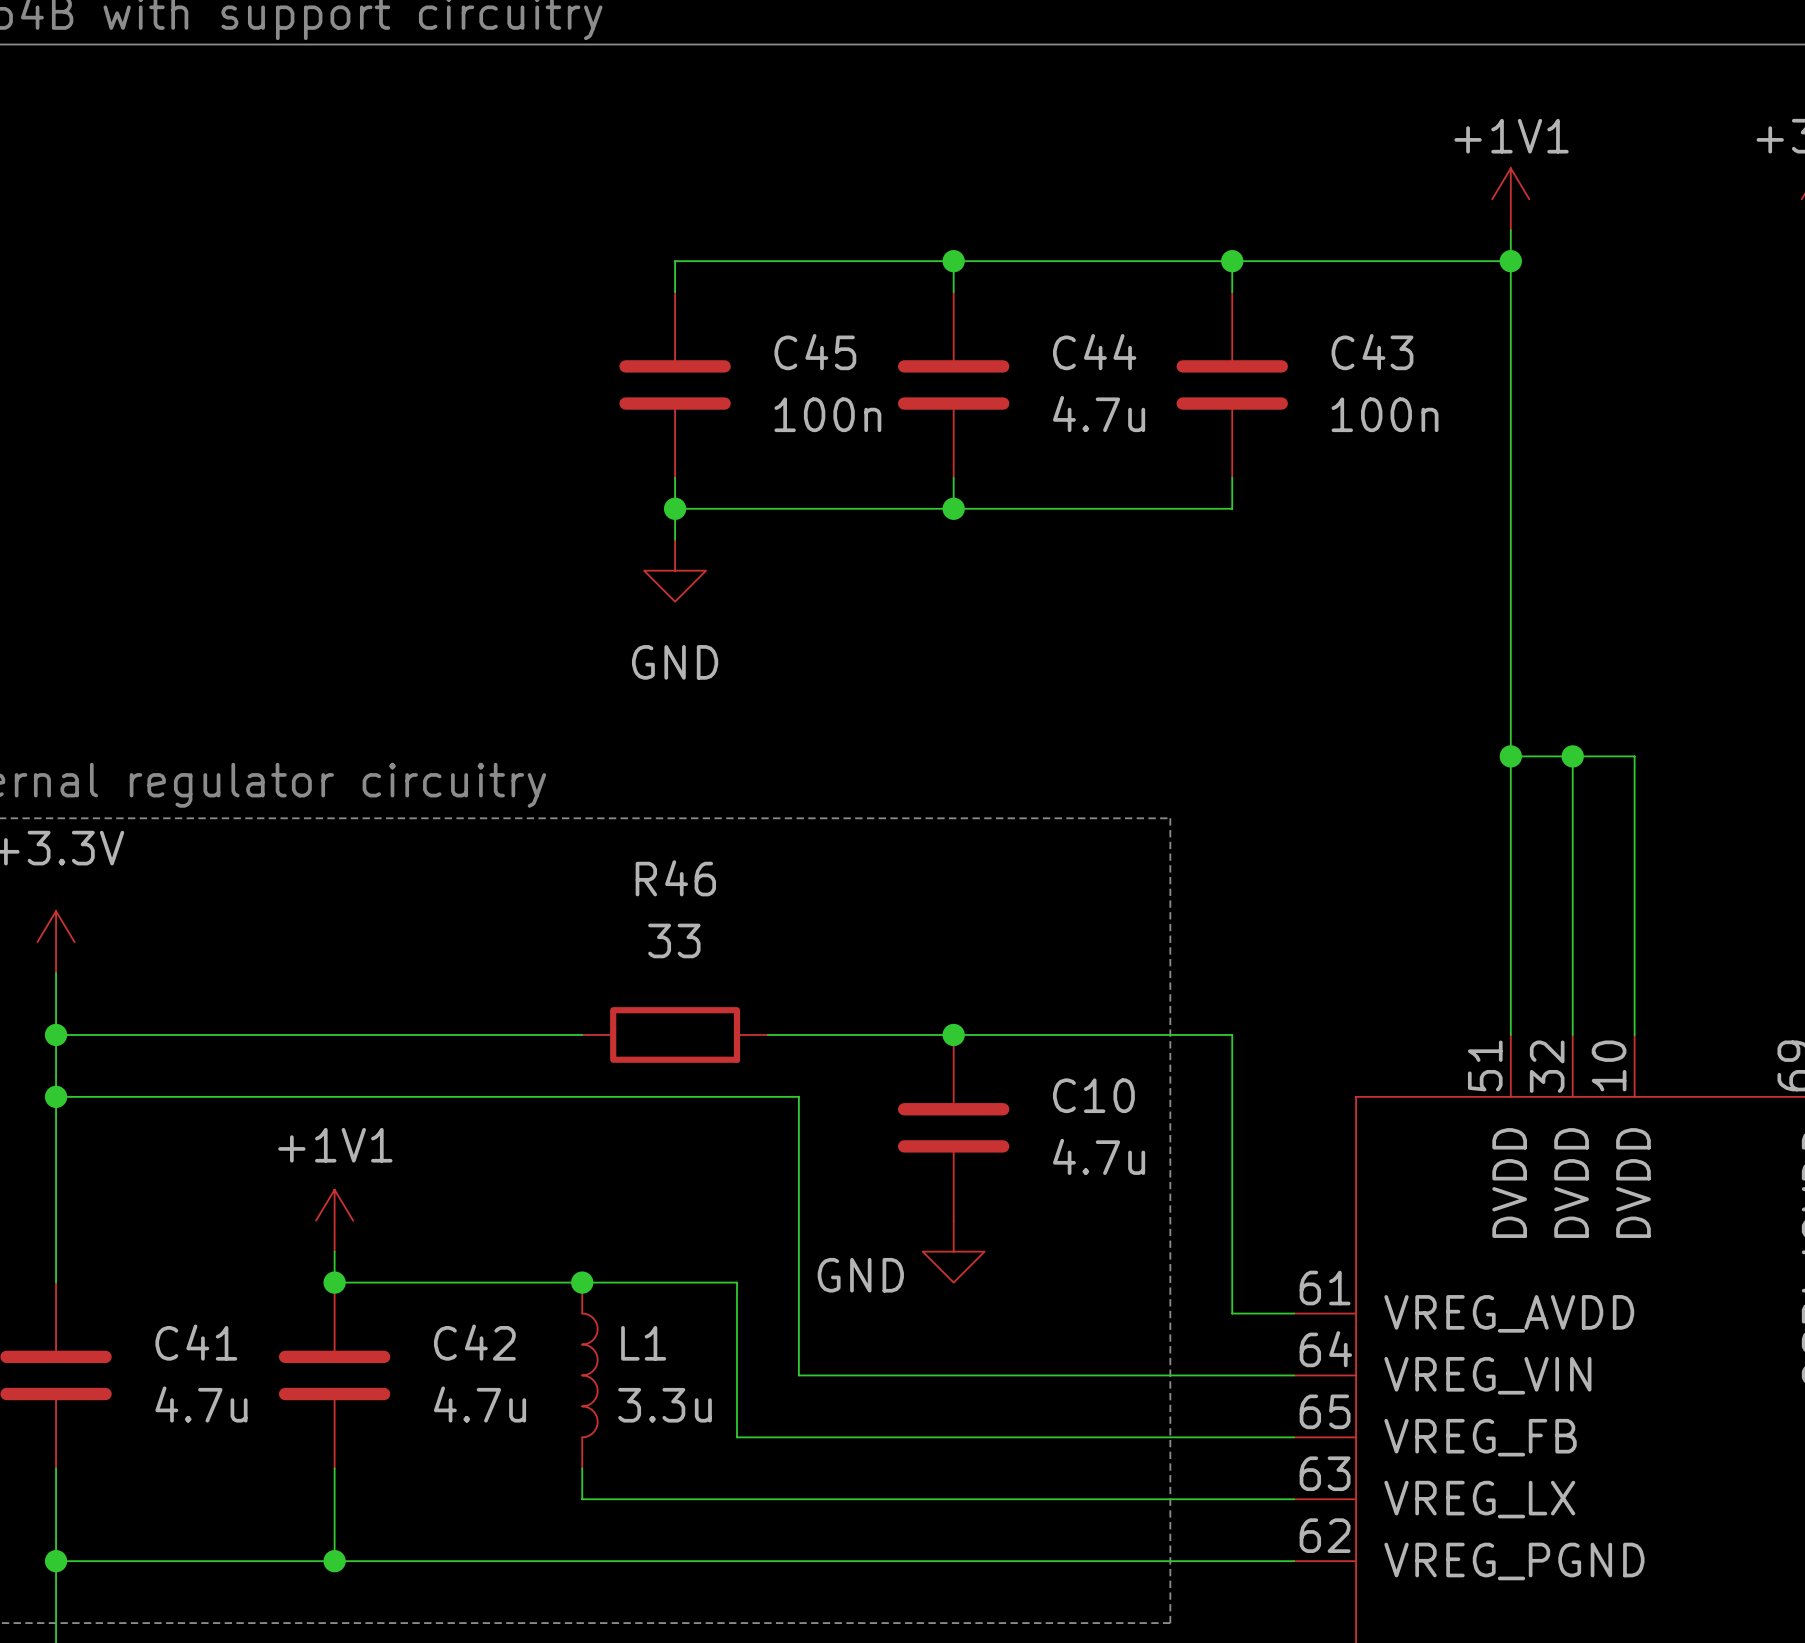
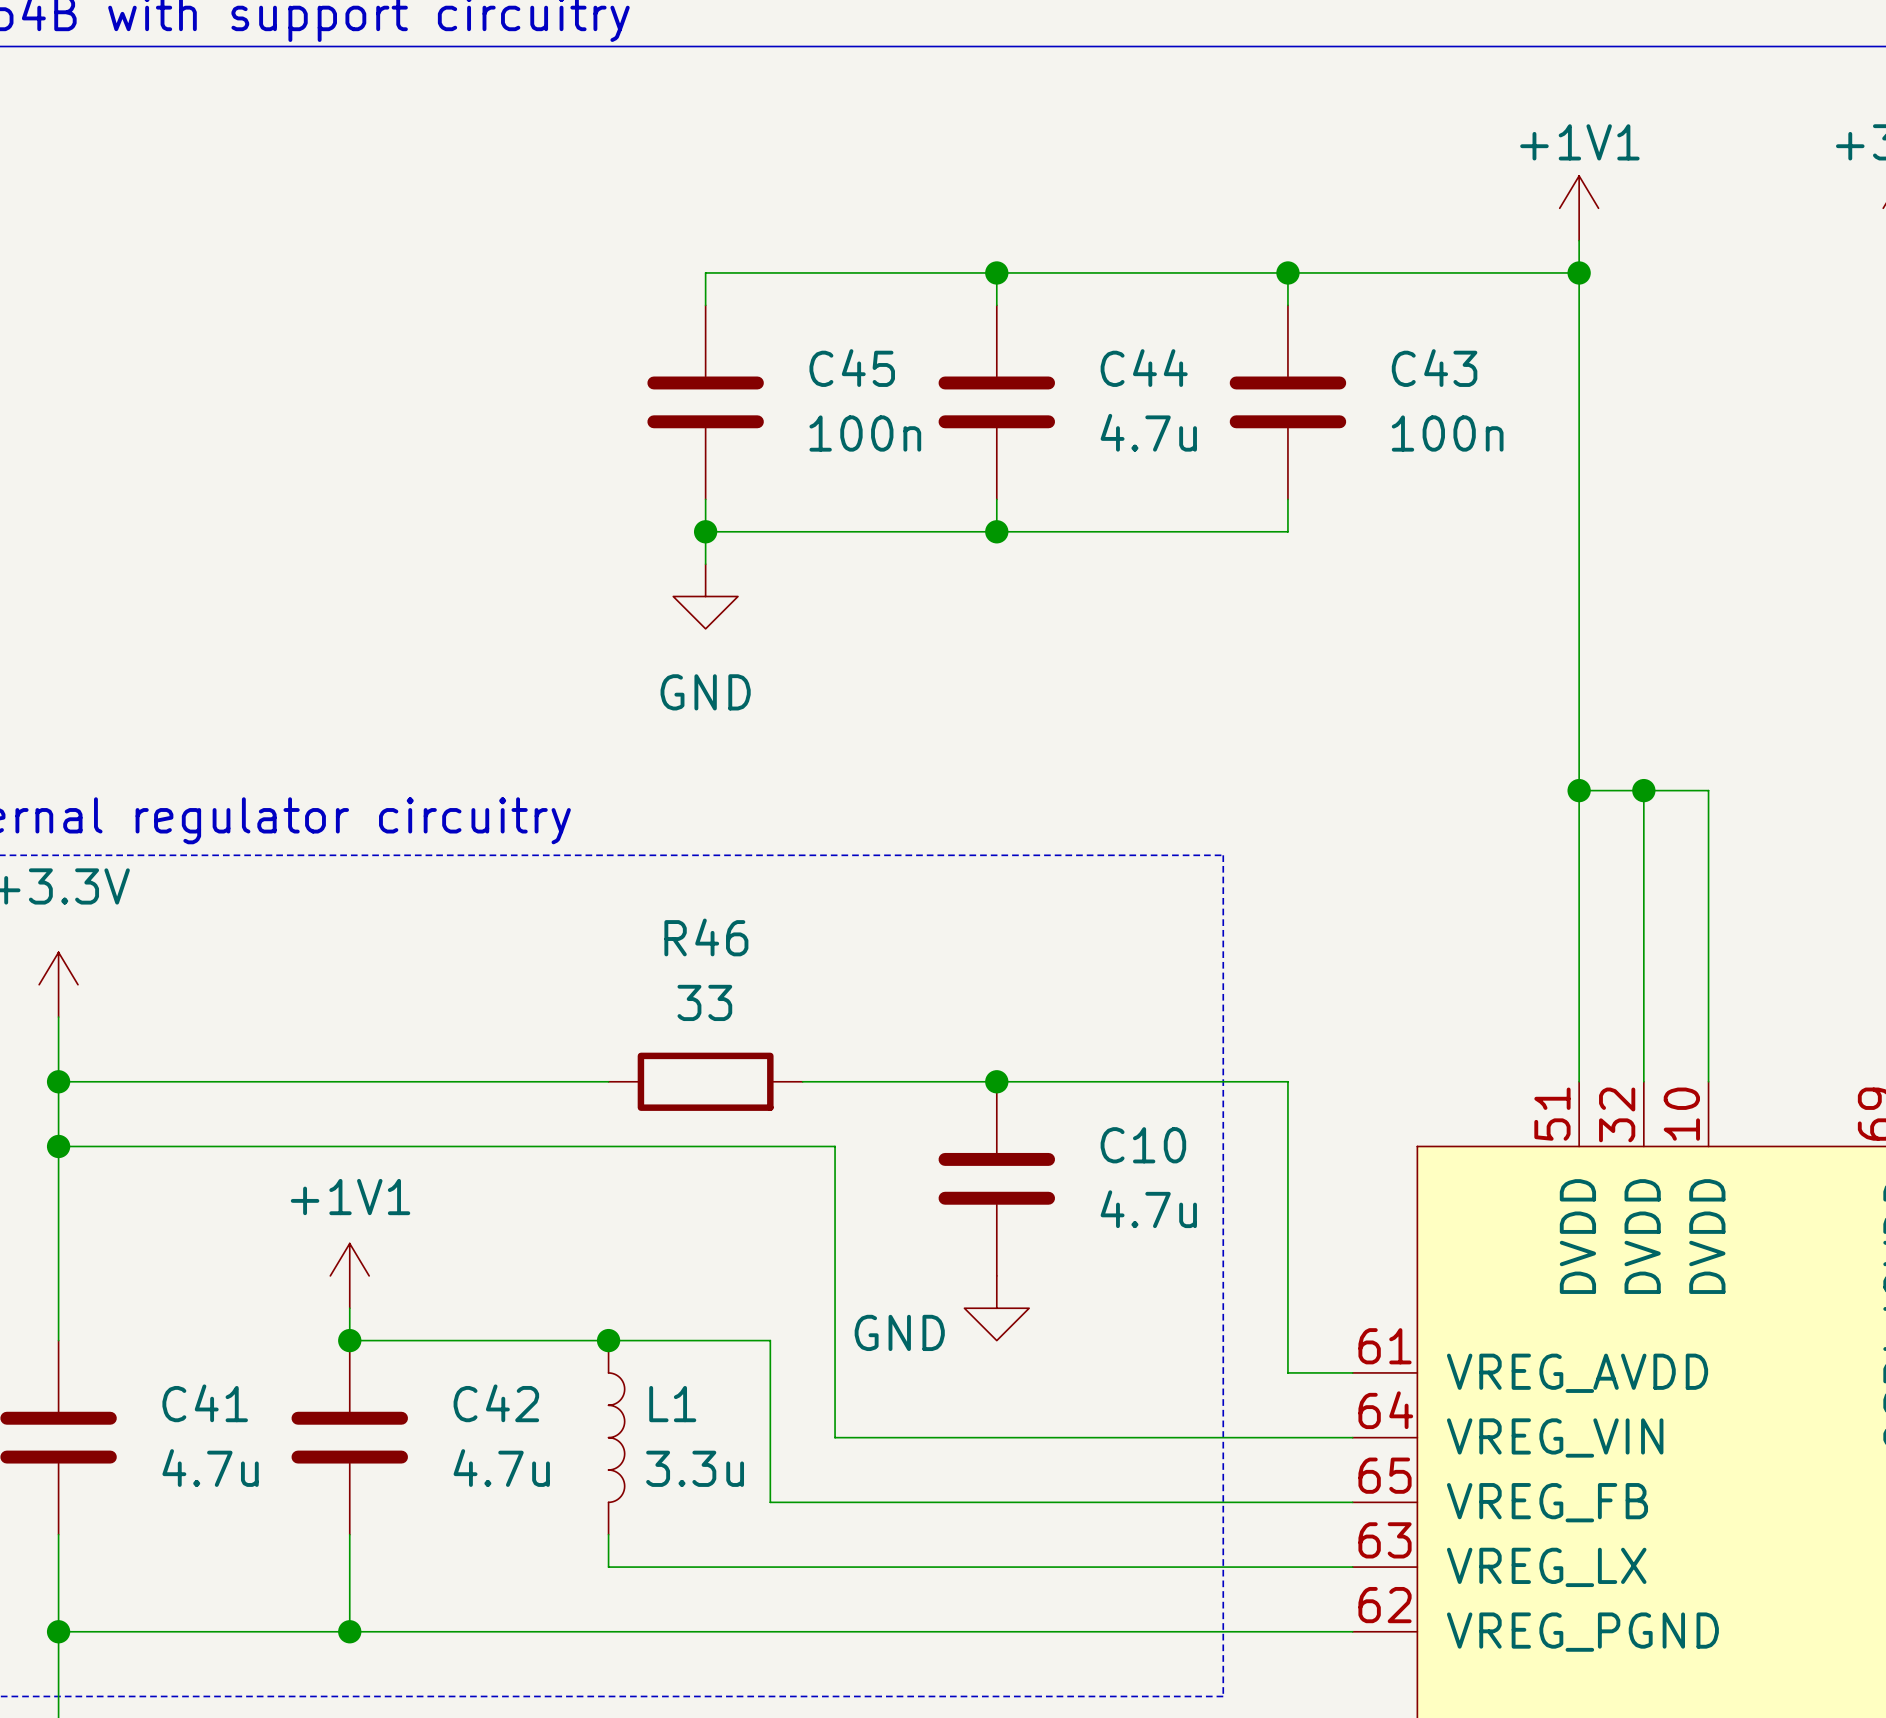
R46 name position: R46 (675, 878) -> R46 (706, 937)
R46 value position: 33 (674, 940) -> 33 (704, 1002)

